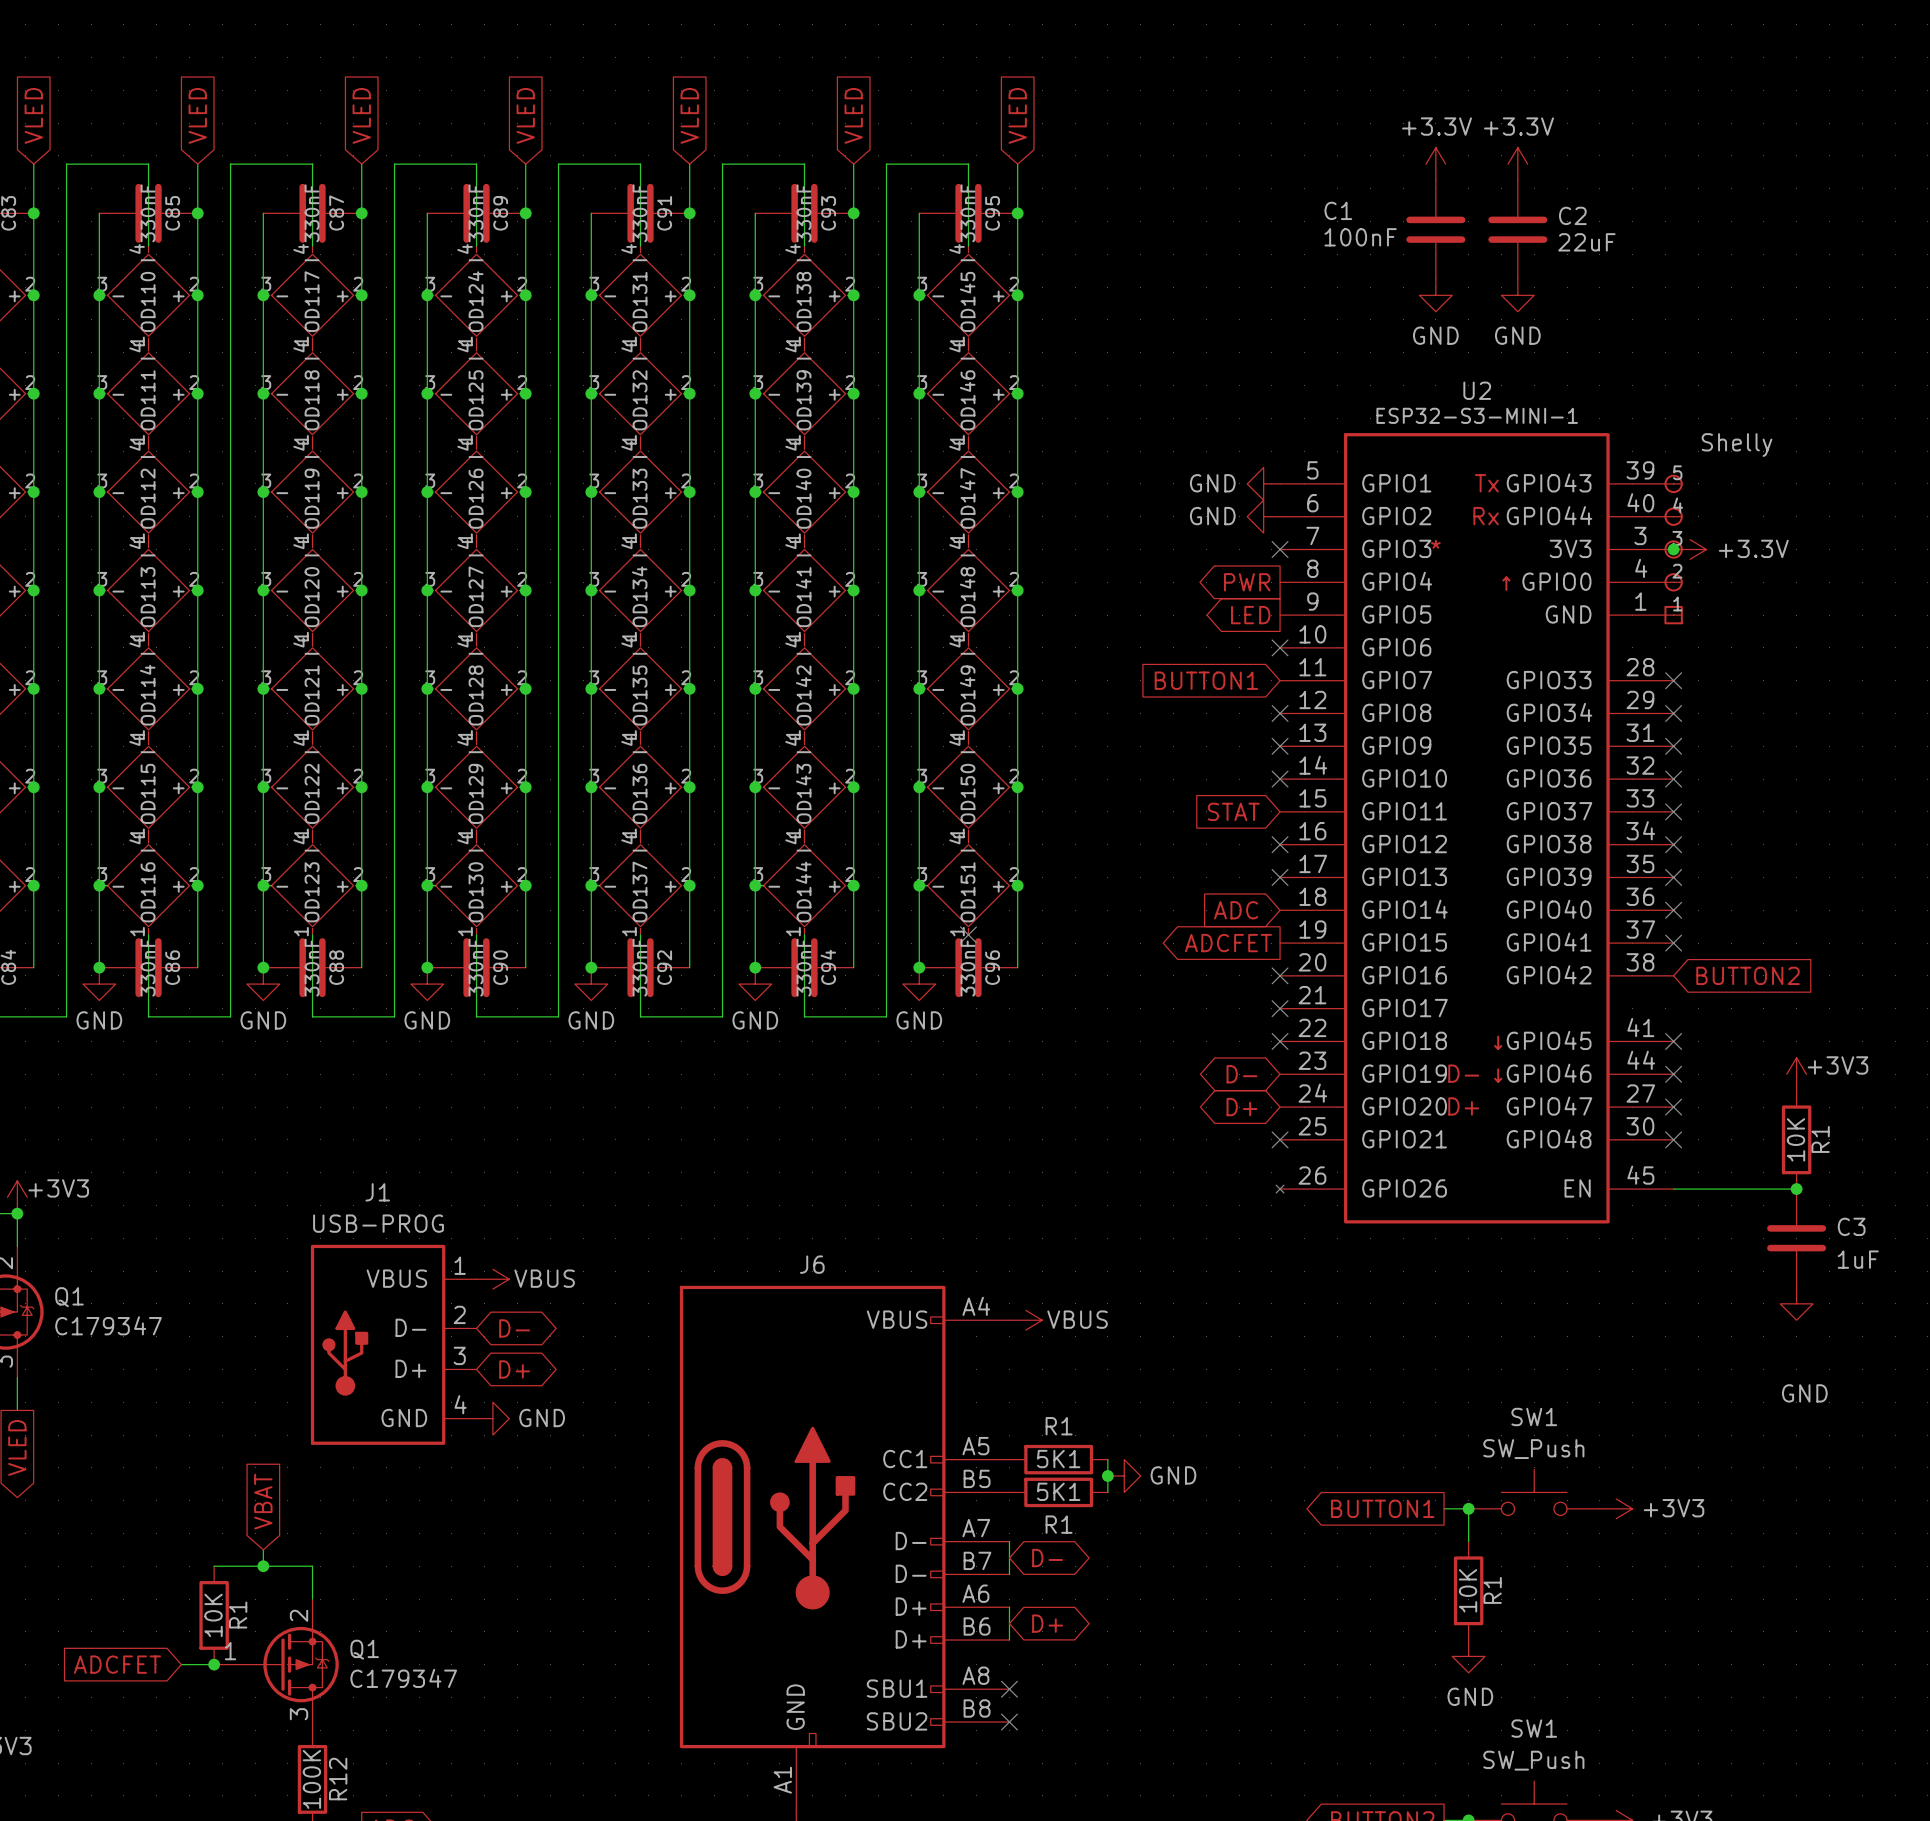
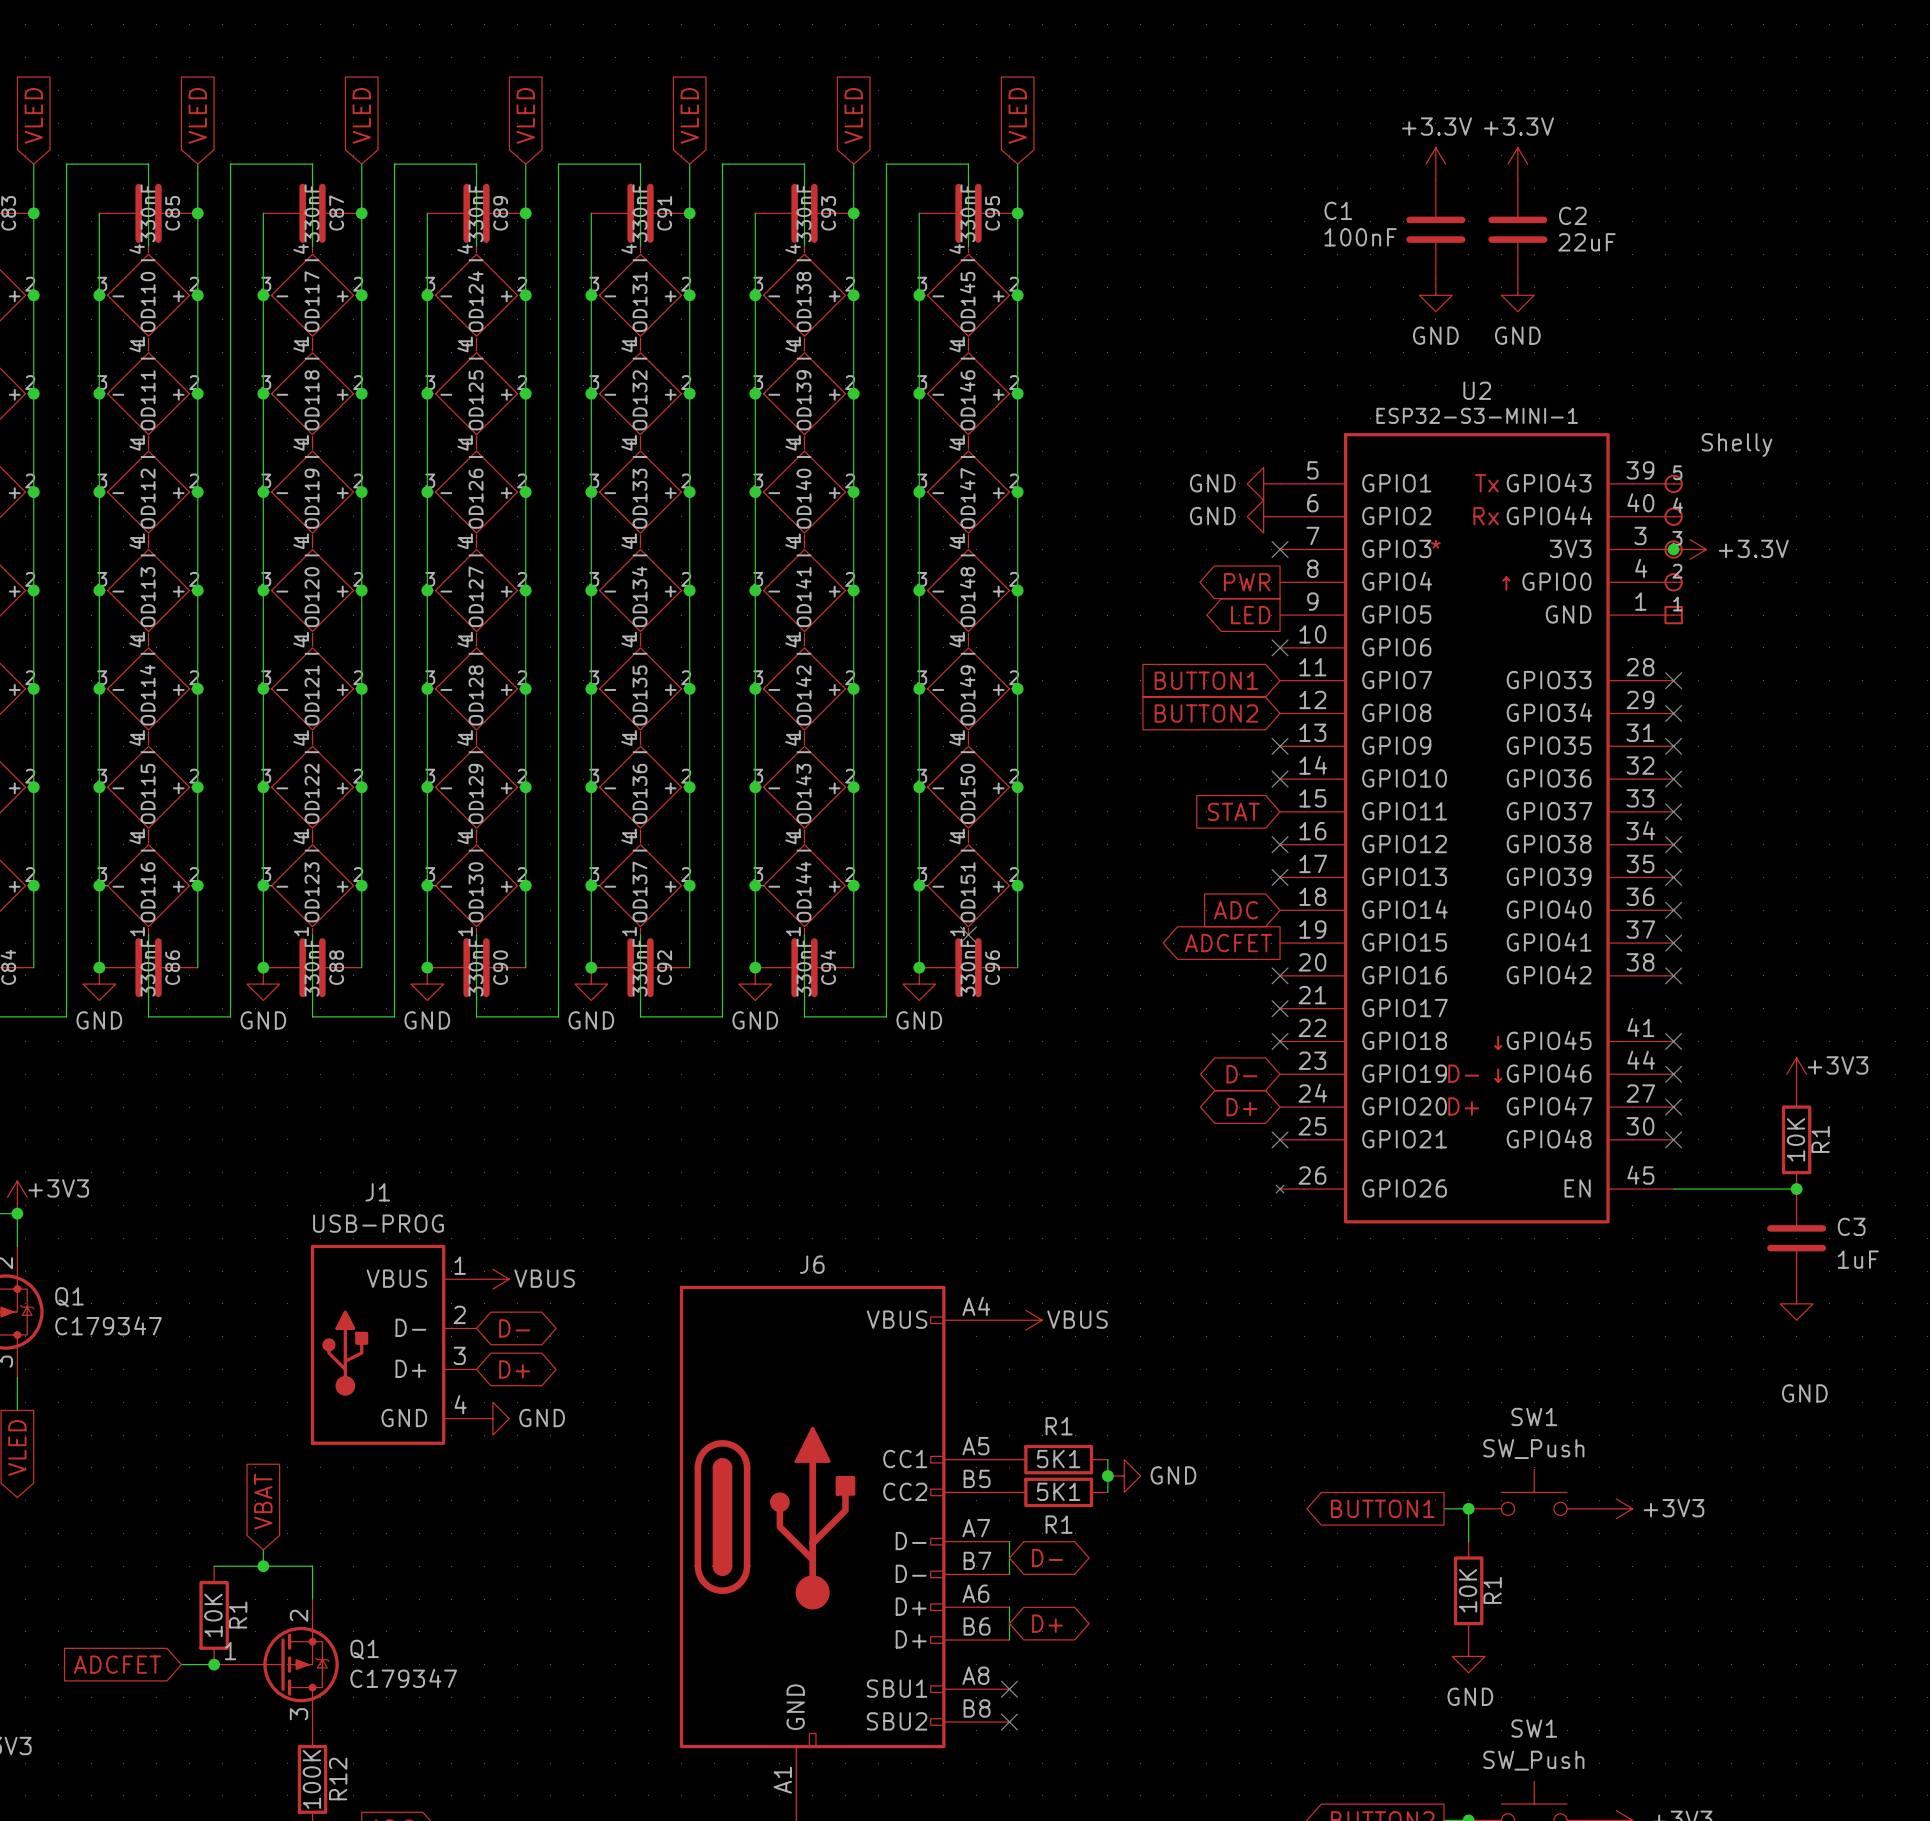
global label: none -> BUTTON2 (1206, 713)
no-connect mark: (1280, 713) -> none
no-connect mark: none -> (1673, 975)
global label: BUTTON2 (1748, 975) -> none

